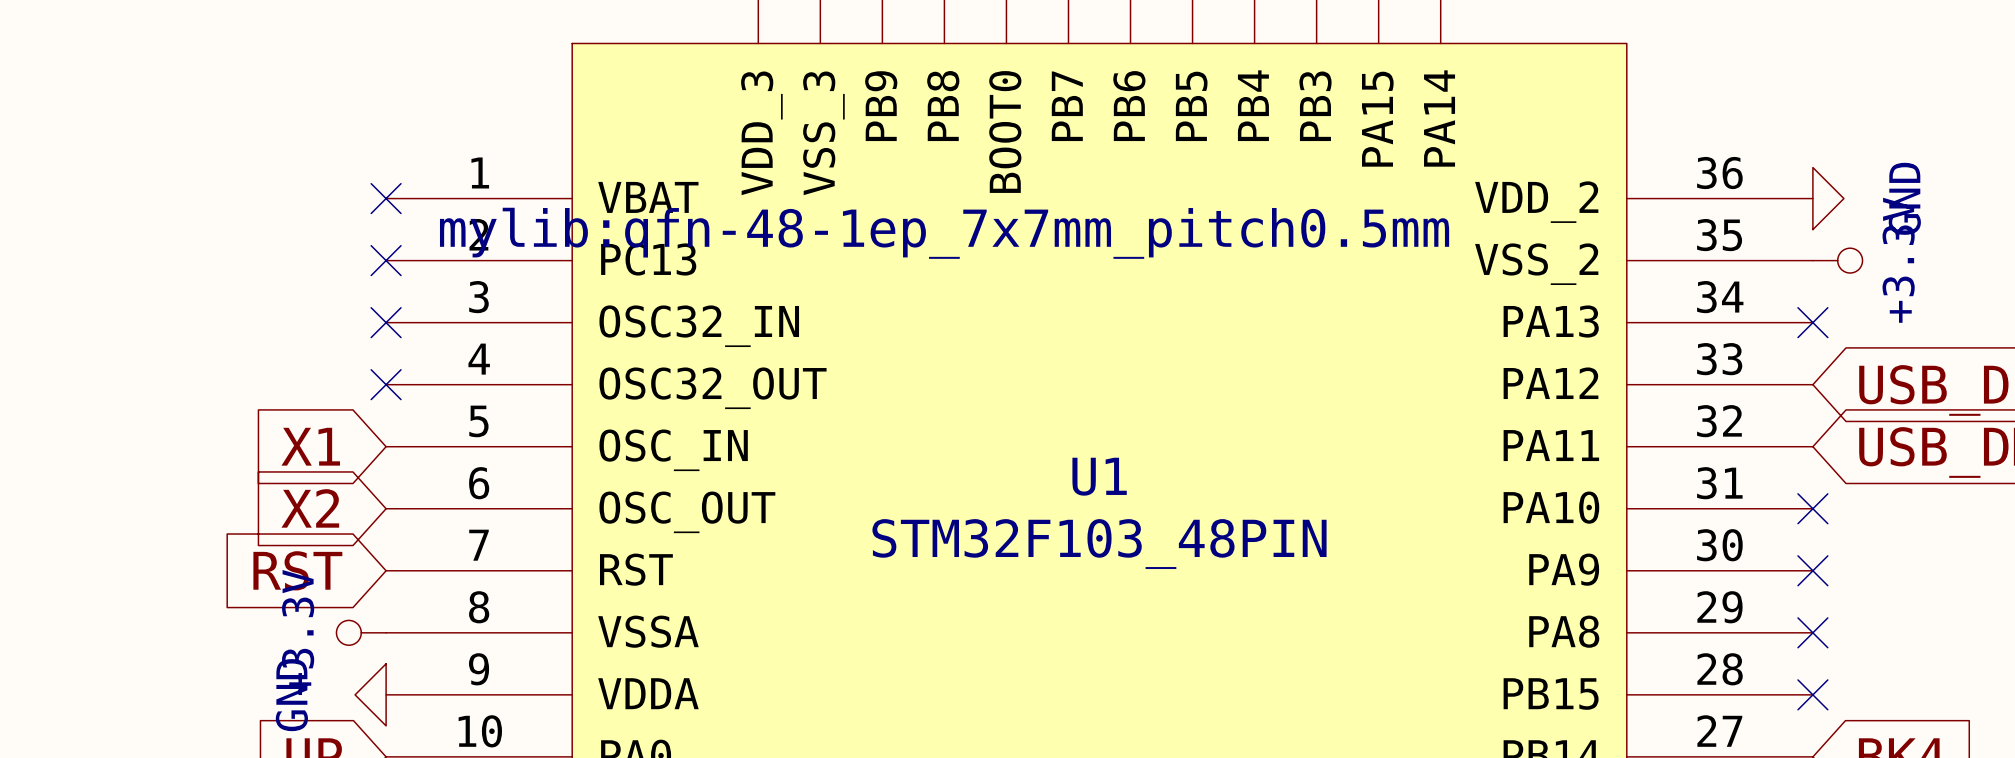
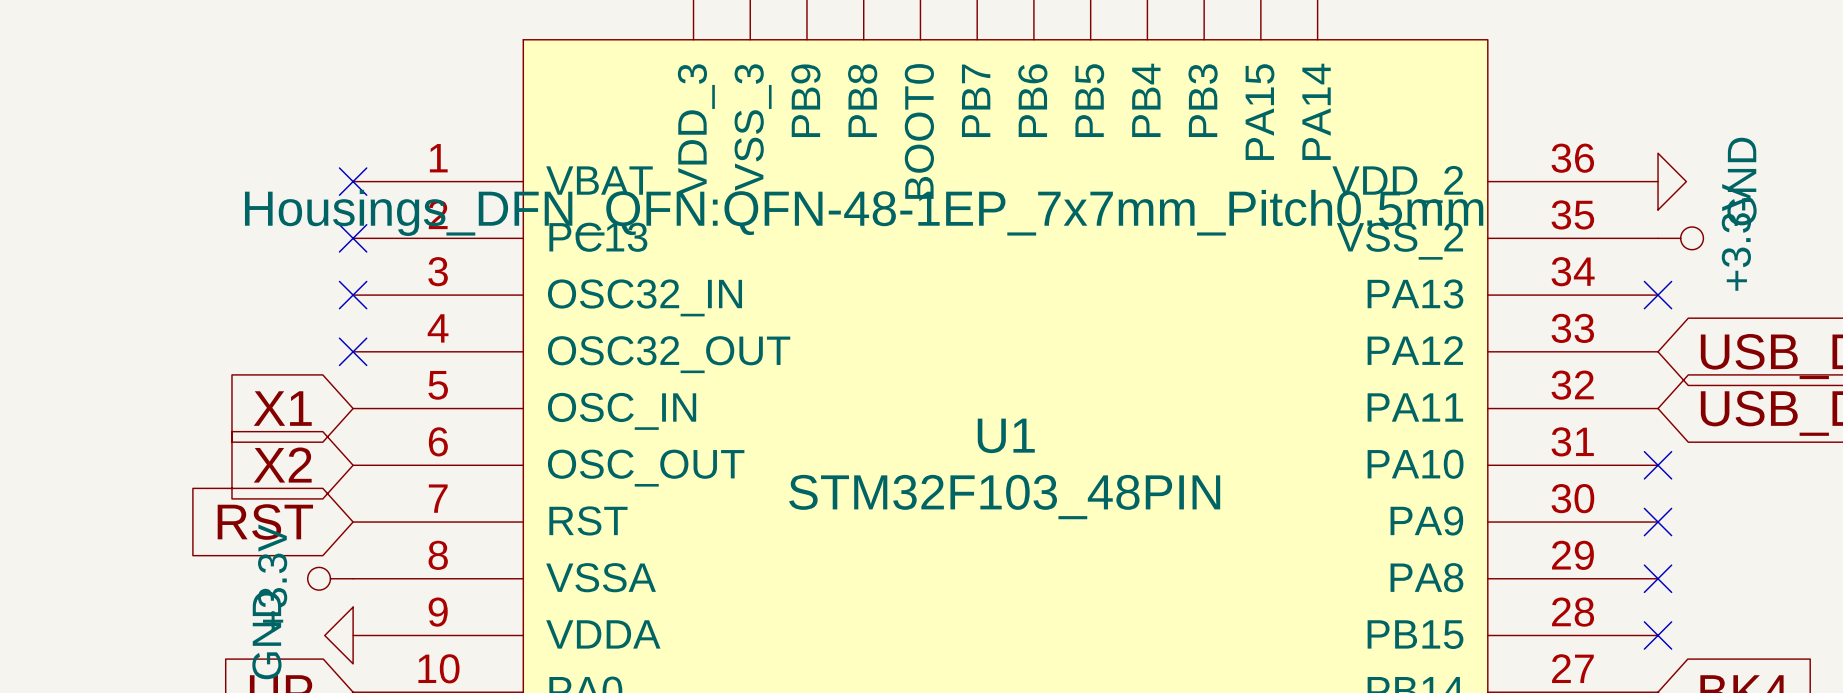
U1 text: mylib:qfn-48-1ep_7x7mm_pitch0.5mm (944, 233) -> Housings_DFN_QFN:QFN-48-1EP_7x7mm_Pitch0.5mm (864, 212)

